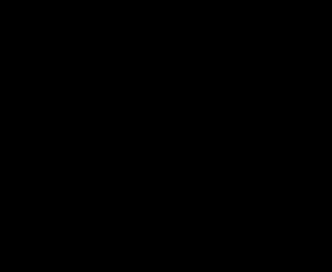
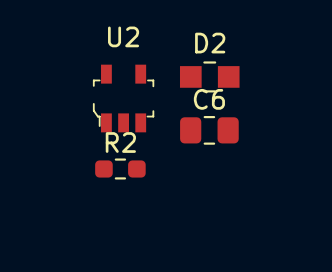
D2: none -> (209, 76)
U2: none -> (123, 98)
C6: none -> (209, 130)
R2: none -> (120, 168)

